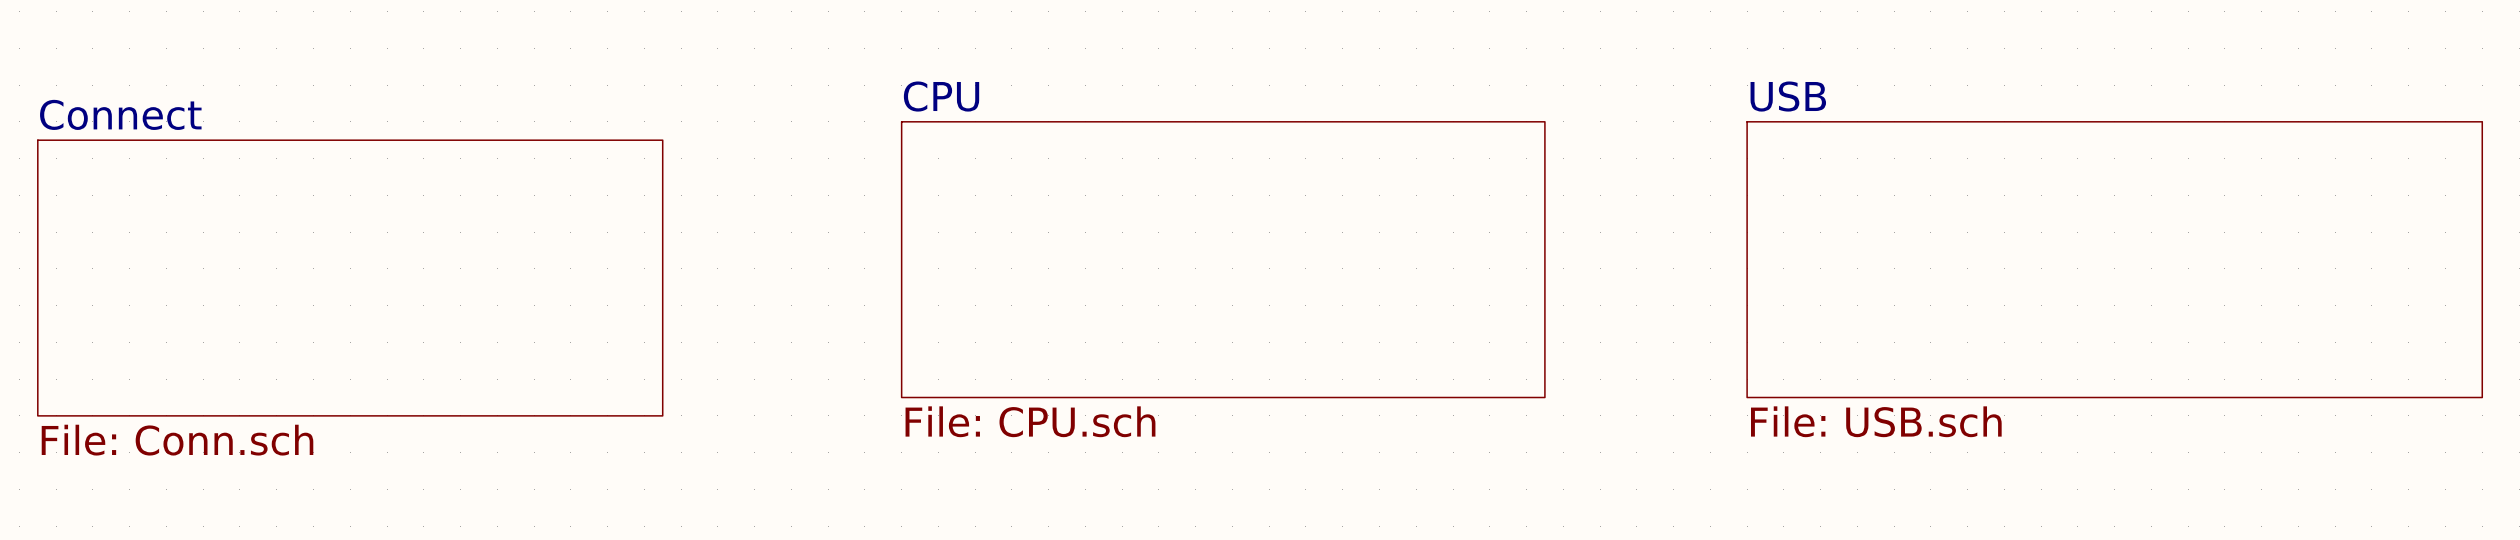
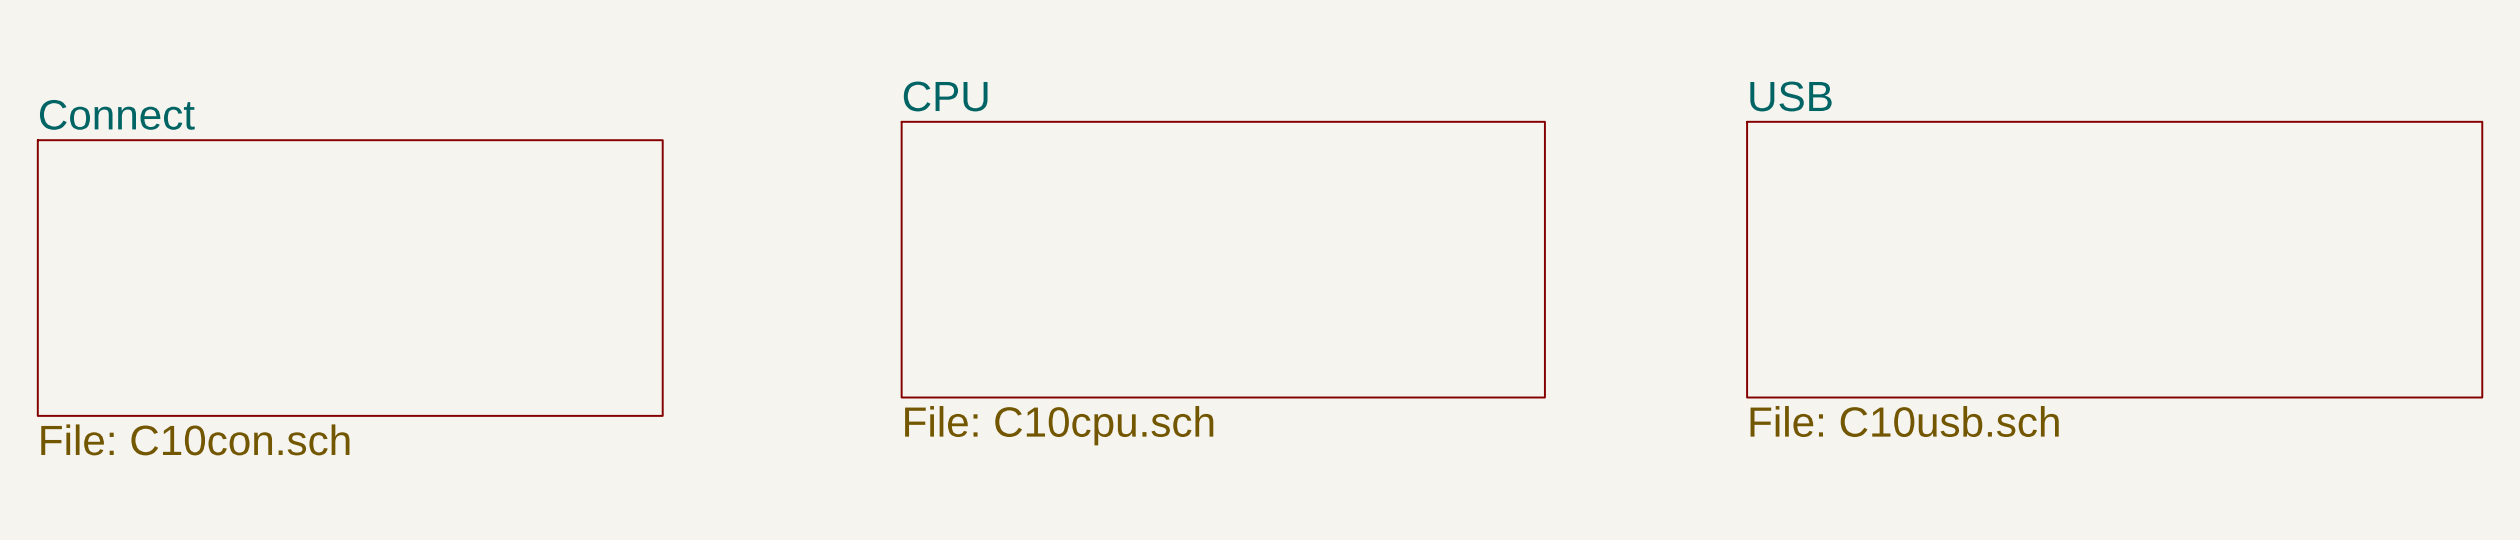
sheet CPU value: File: CPU.sch (1030, 421) -> File: C10cpu.sch (1059, 425)
sheet USB value: File: USB.sch (1876, 421) -> File: C10usb.sch (1904, 421)
sheet Connect value: File: Conn.sch (177, 440) -> File: C10con.sch (195, 439)

